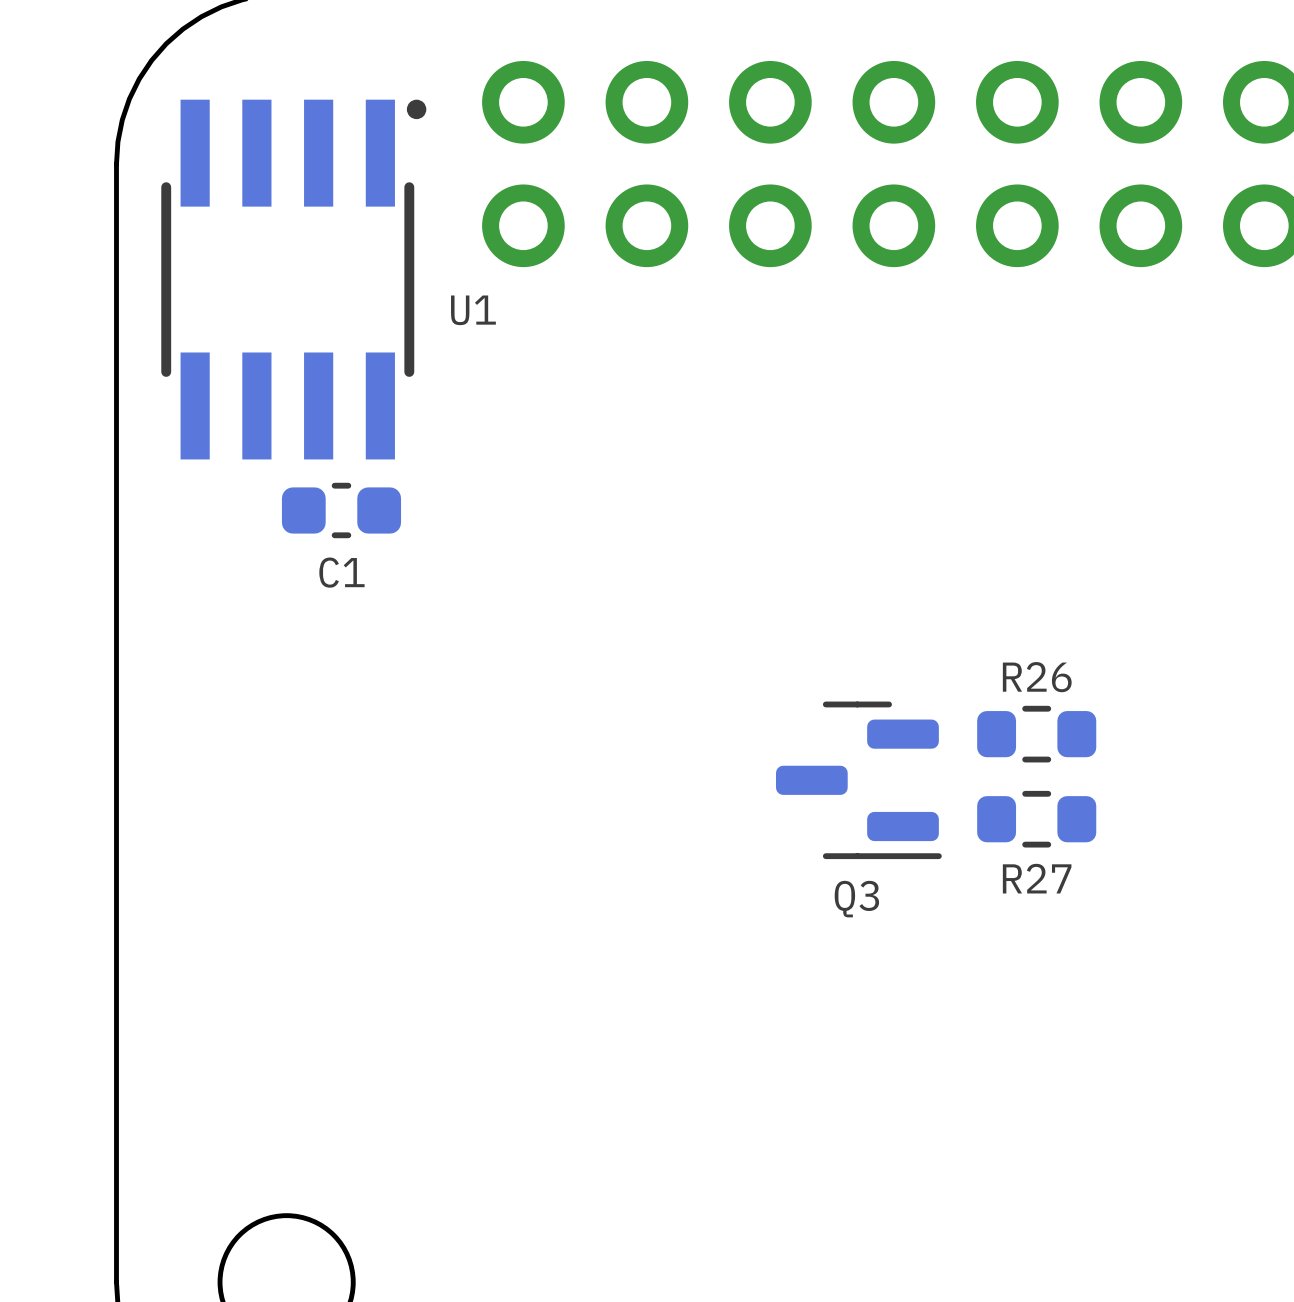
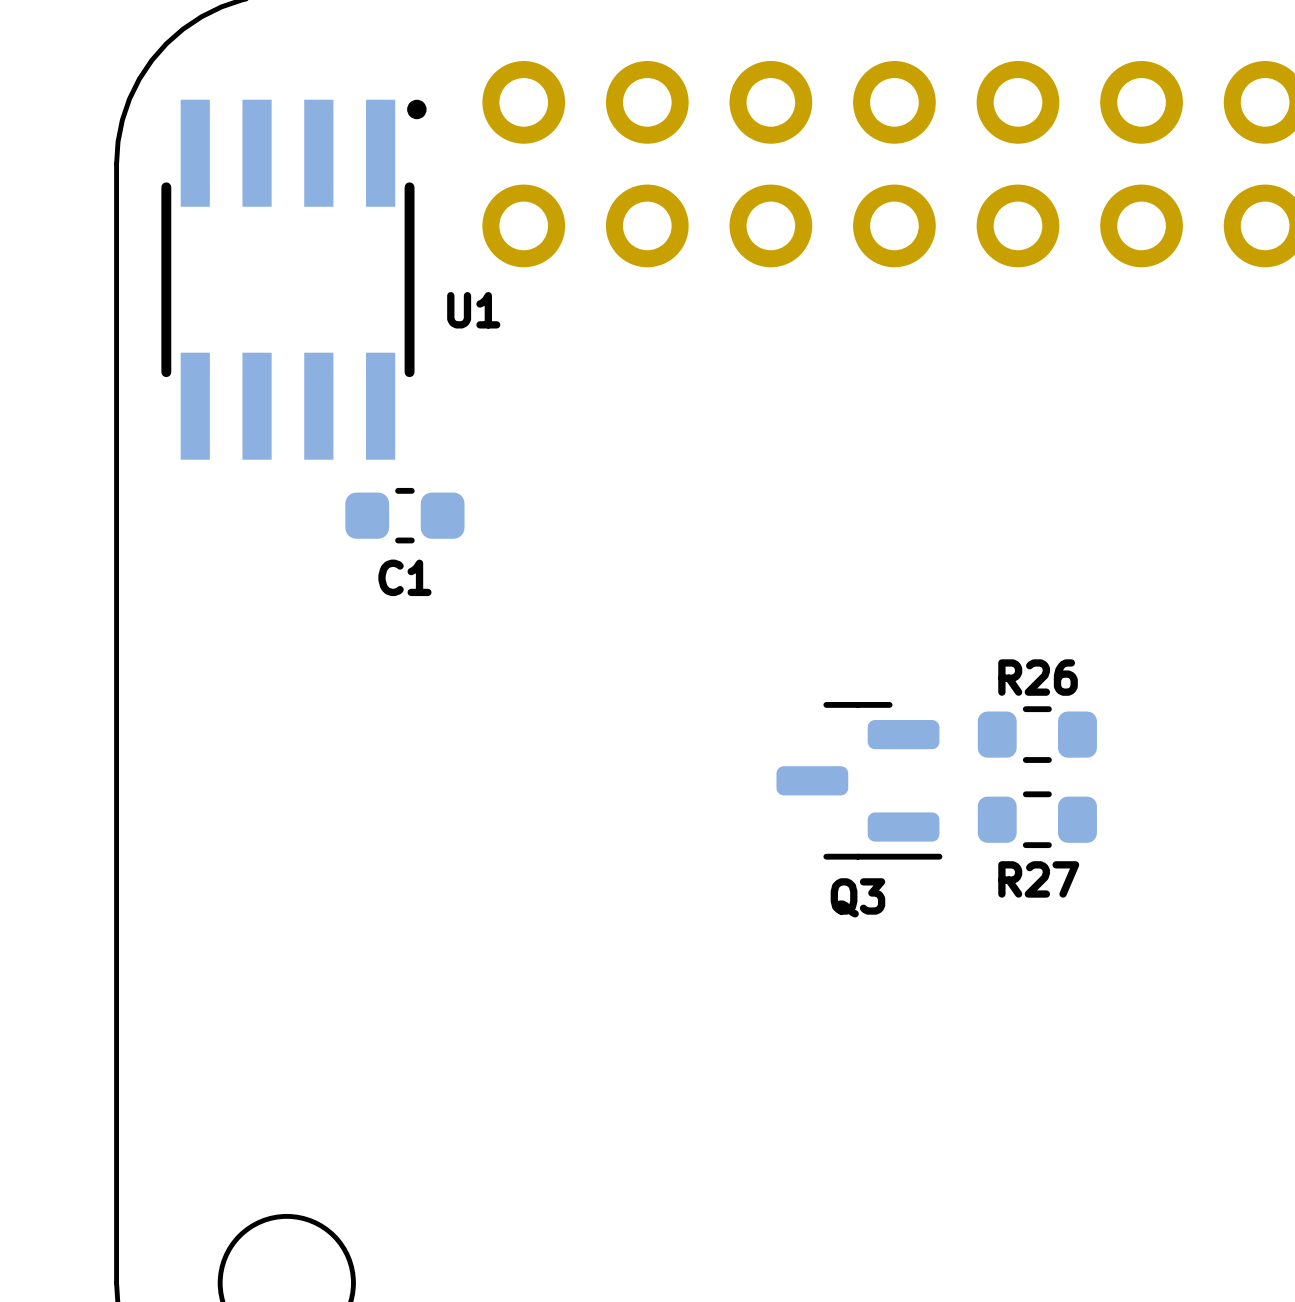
C1 position: (341, 510) -> (404, 515)

